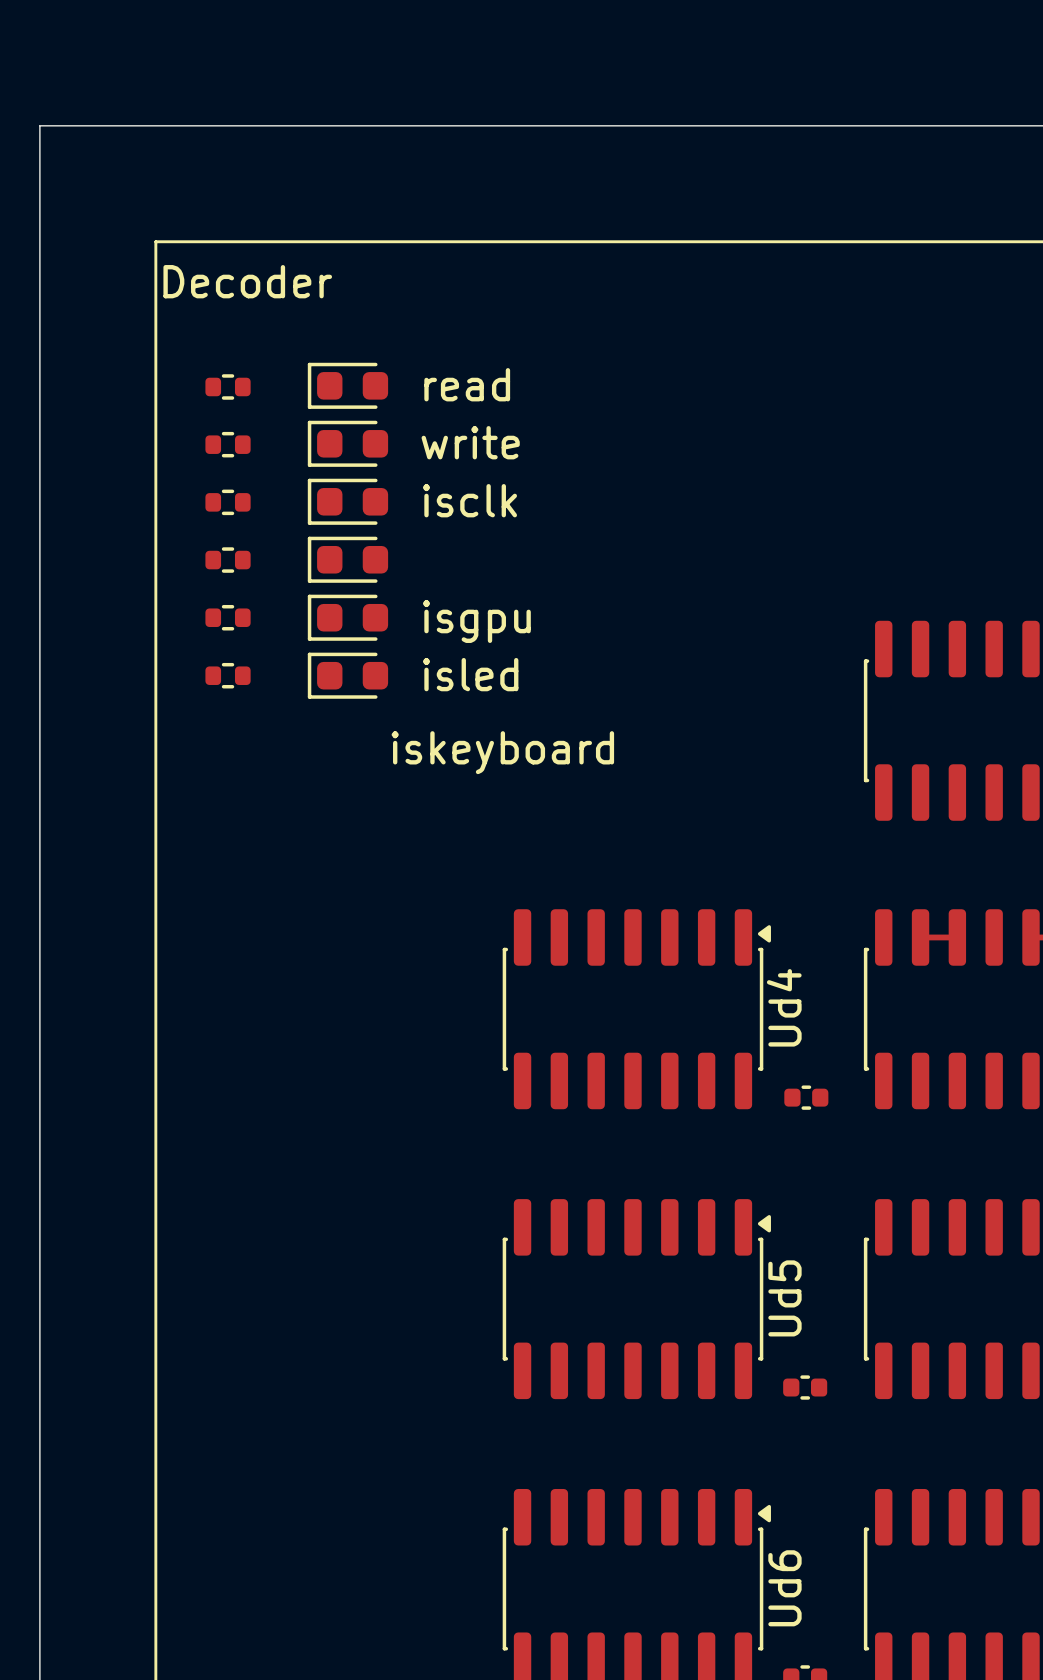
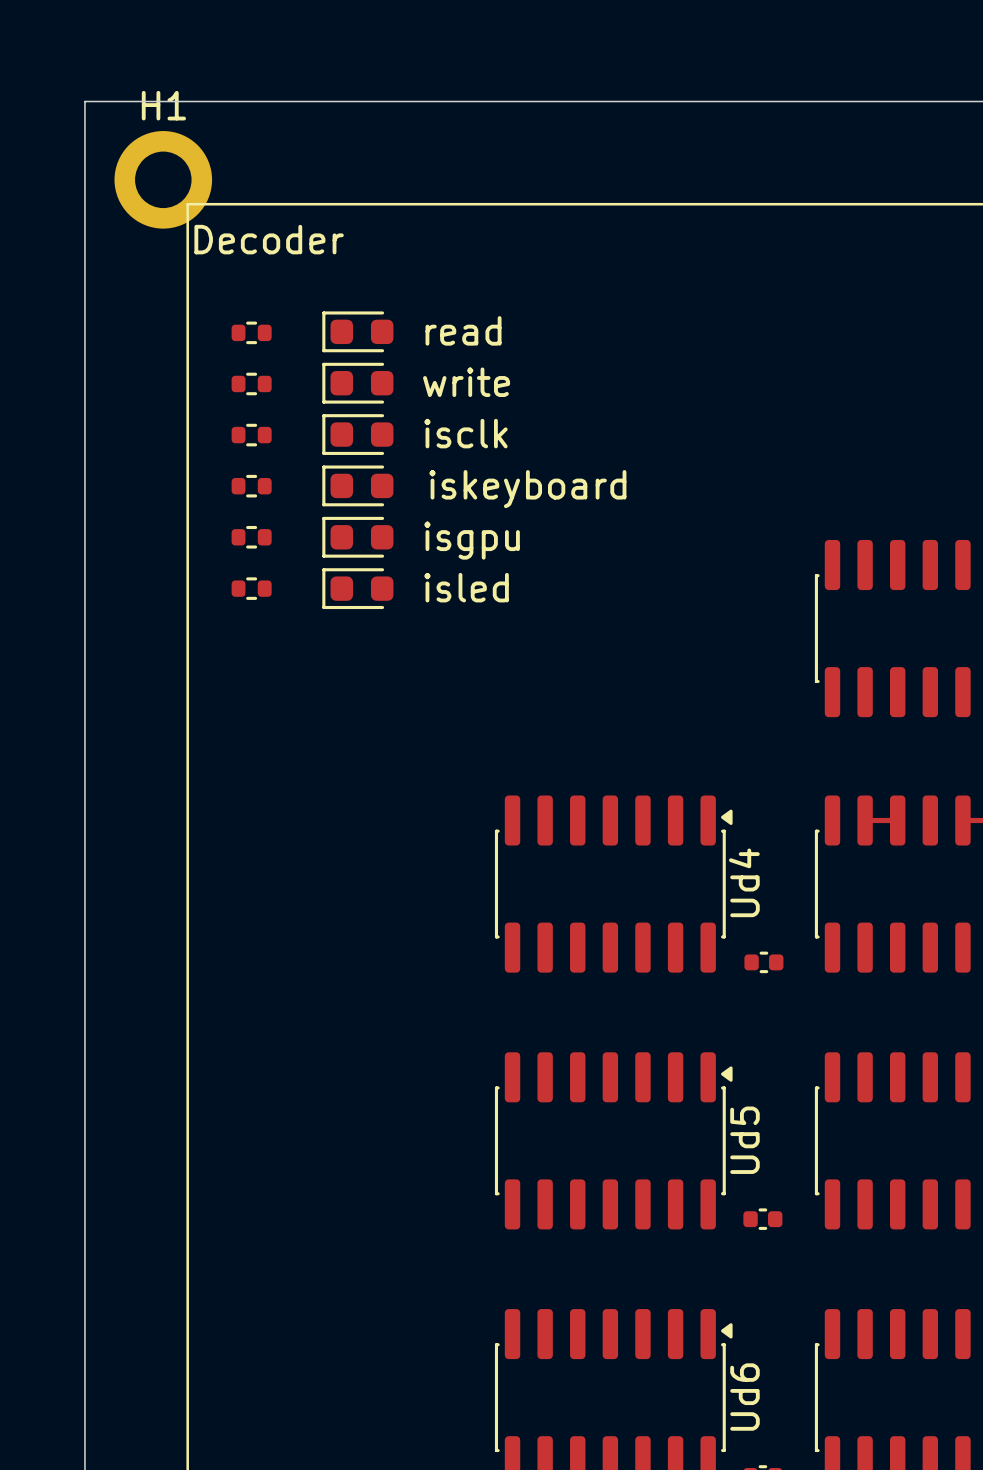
H1: none -> (163, 179)
text position: iskeyboard (502, 752) -> iskeyboard (527, 489)

